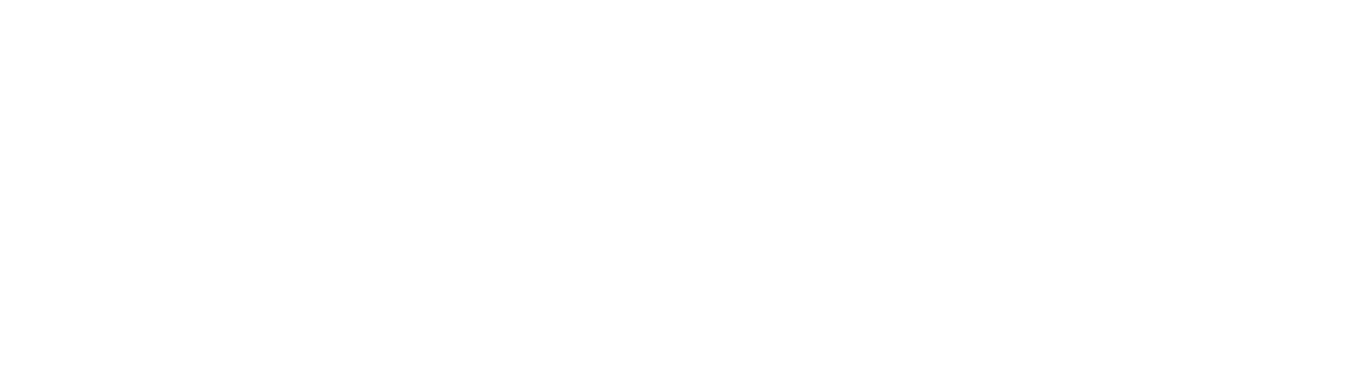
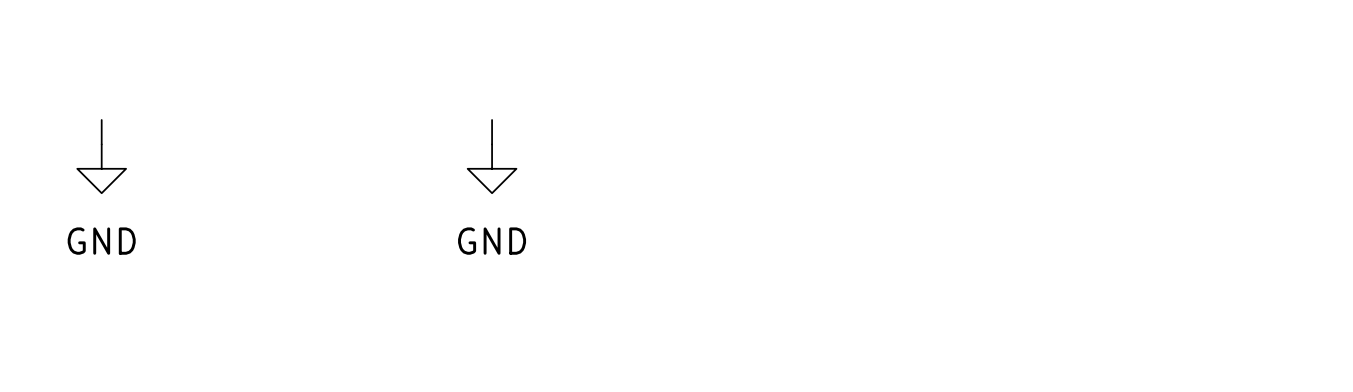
wire: none -> (101, 120) (101, 144)
wire: none -> (492, 120) (492, 144)
power symbol: none -> GND (101, 168)
power symbol: none -> GND (492, 168)

